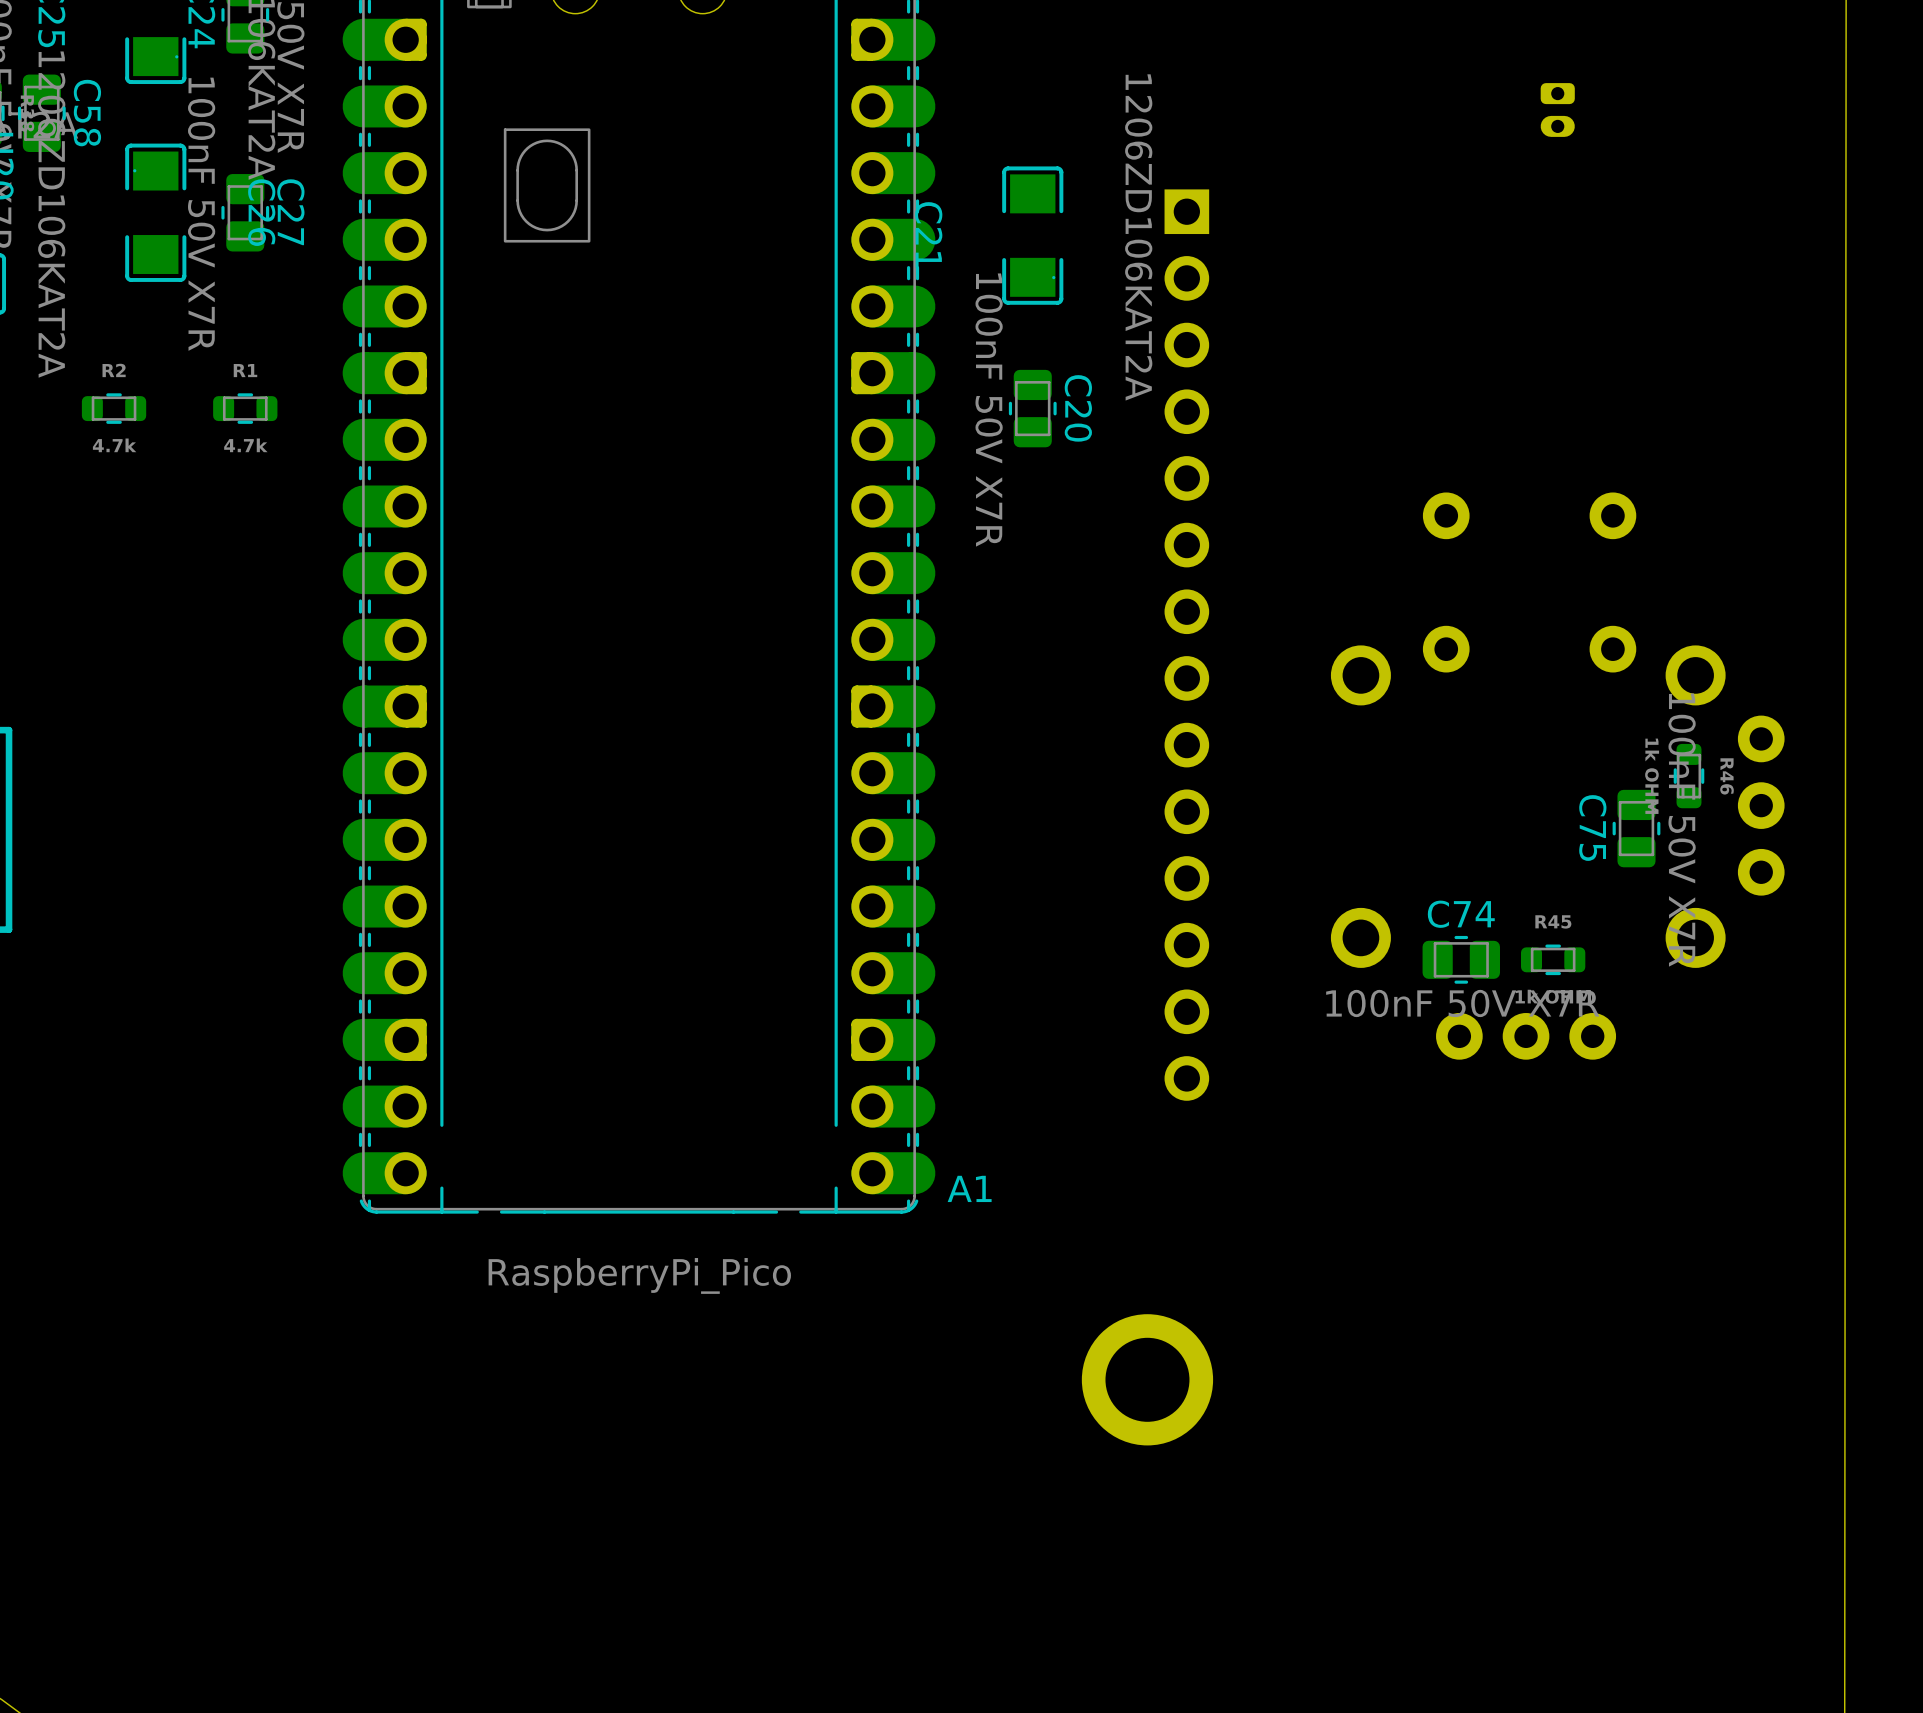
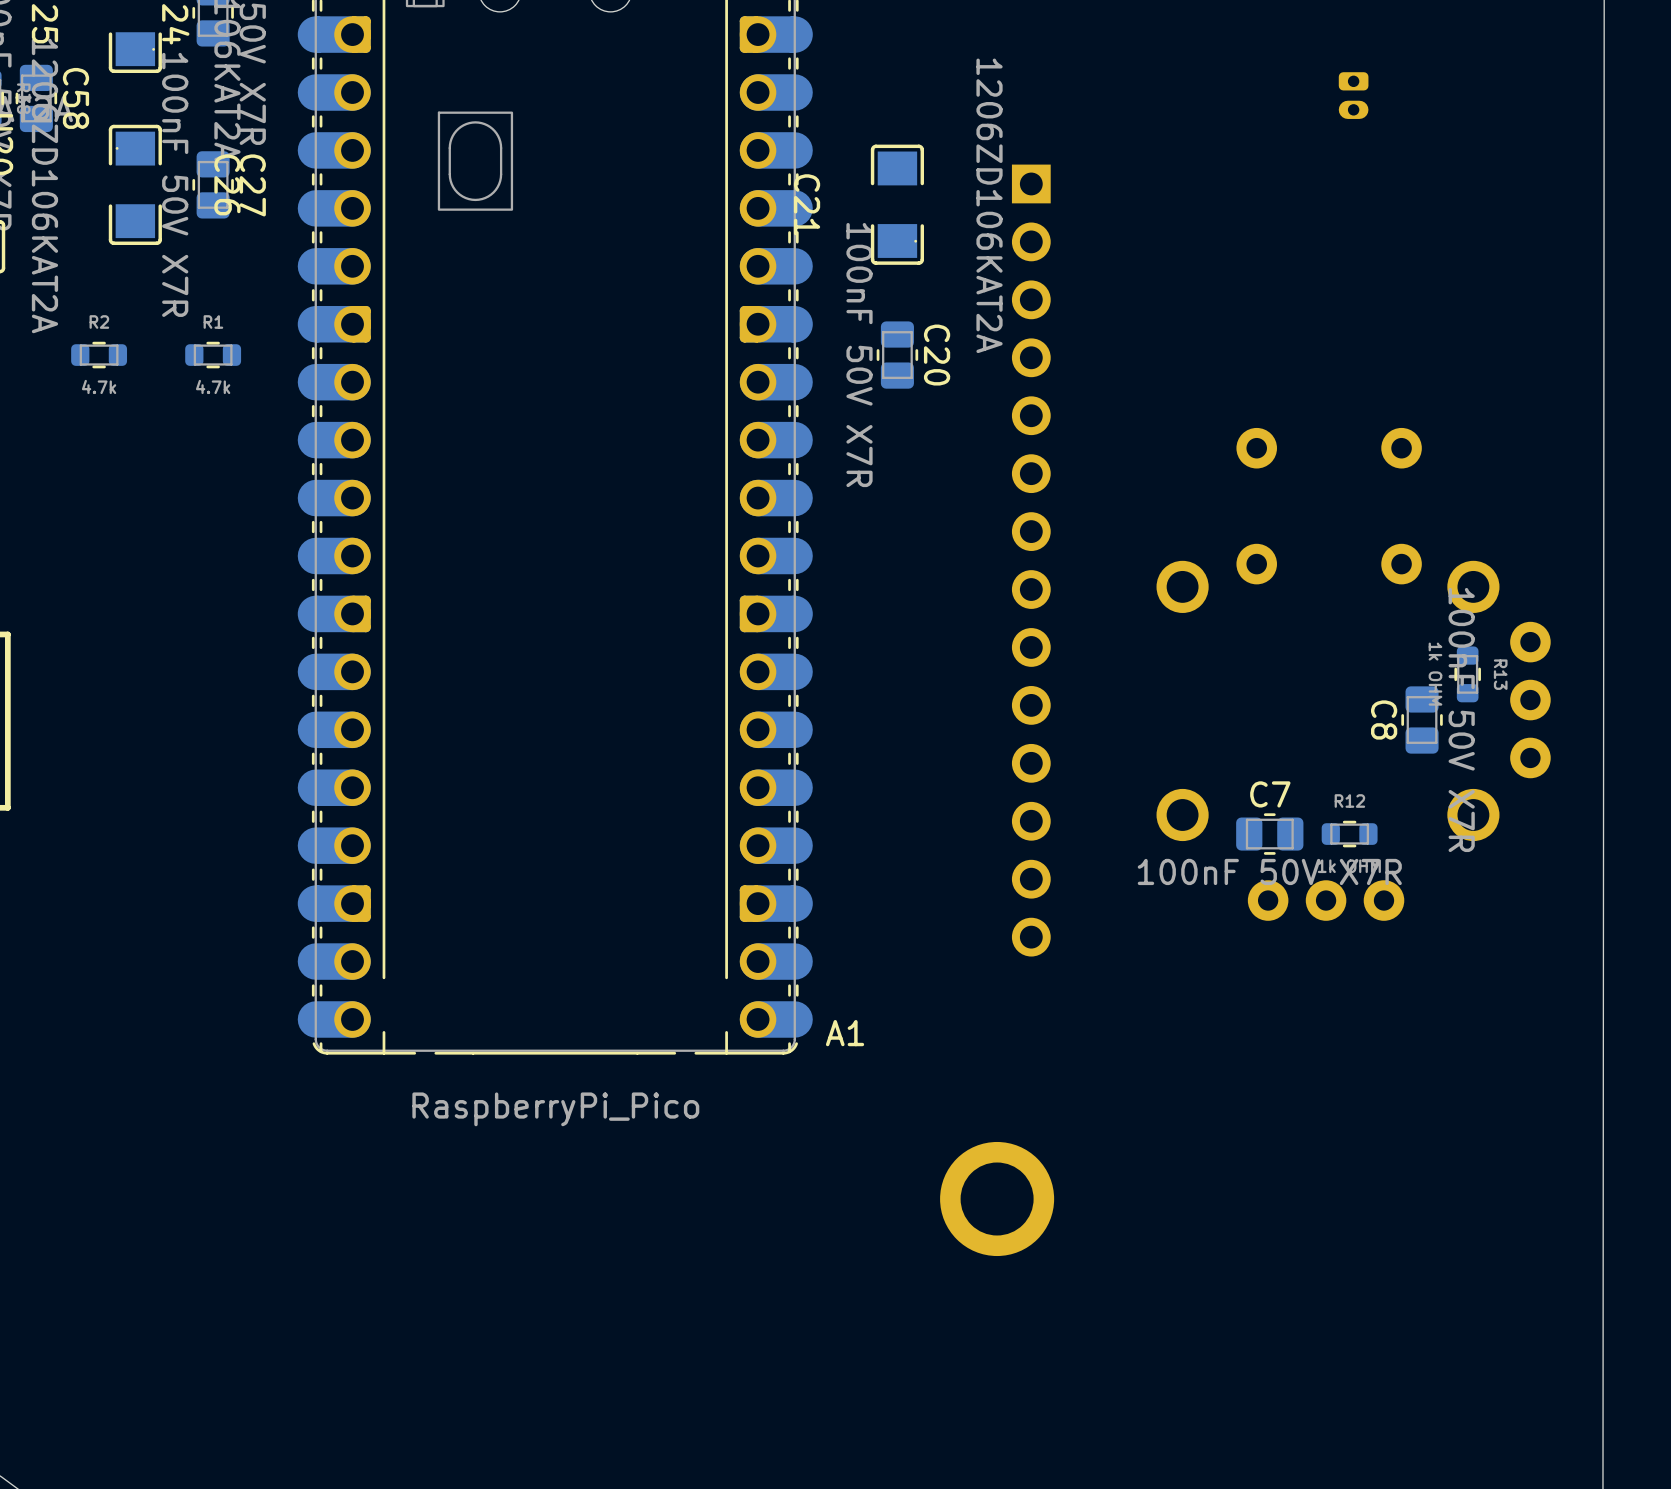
R46 name: R46 (1727, 776) -> R13 (1500, 674)
C75 name: C75 (1592, 828) -> C8 (1384, 719)
C74 name: C74 (1461, 914) -> C7 (1270, 794)
R45 name: R45 (1553, 921) -> R12 (1349, 801)

